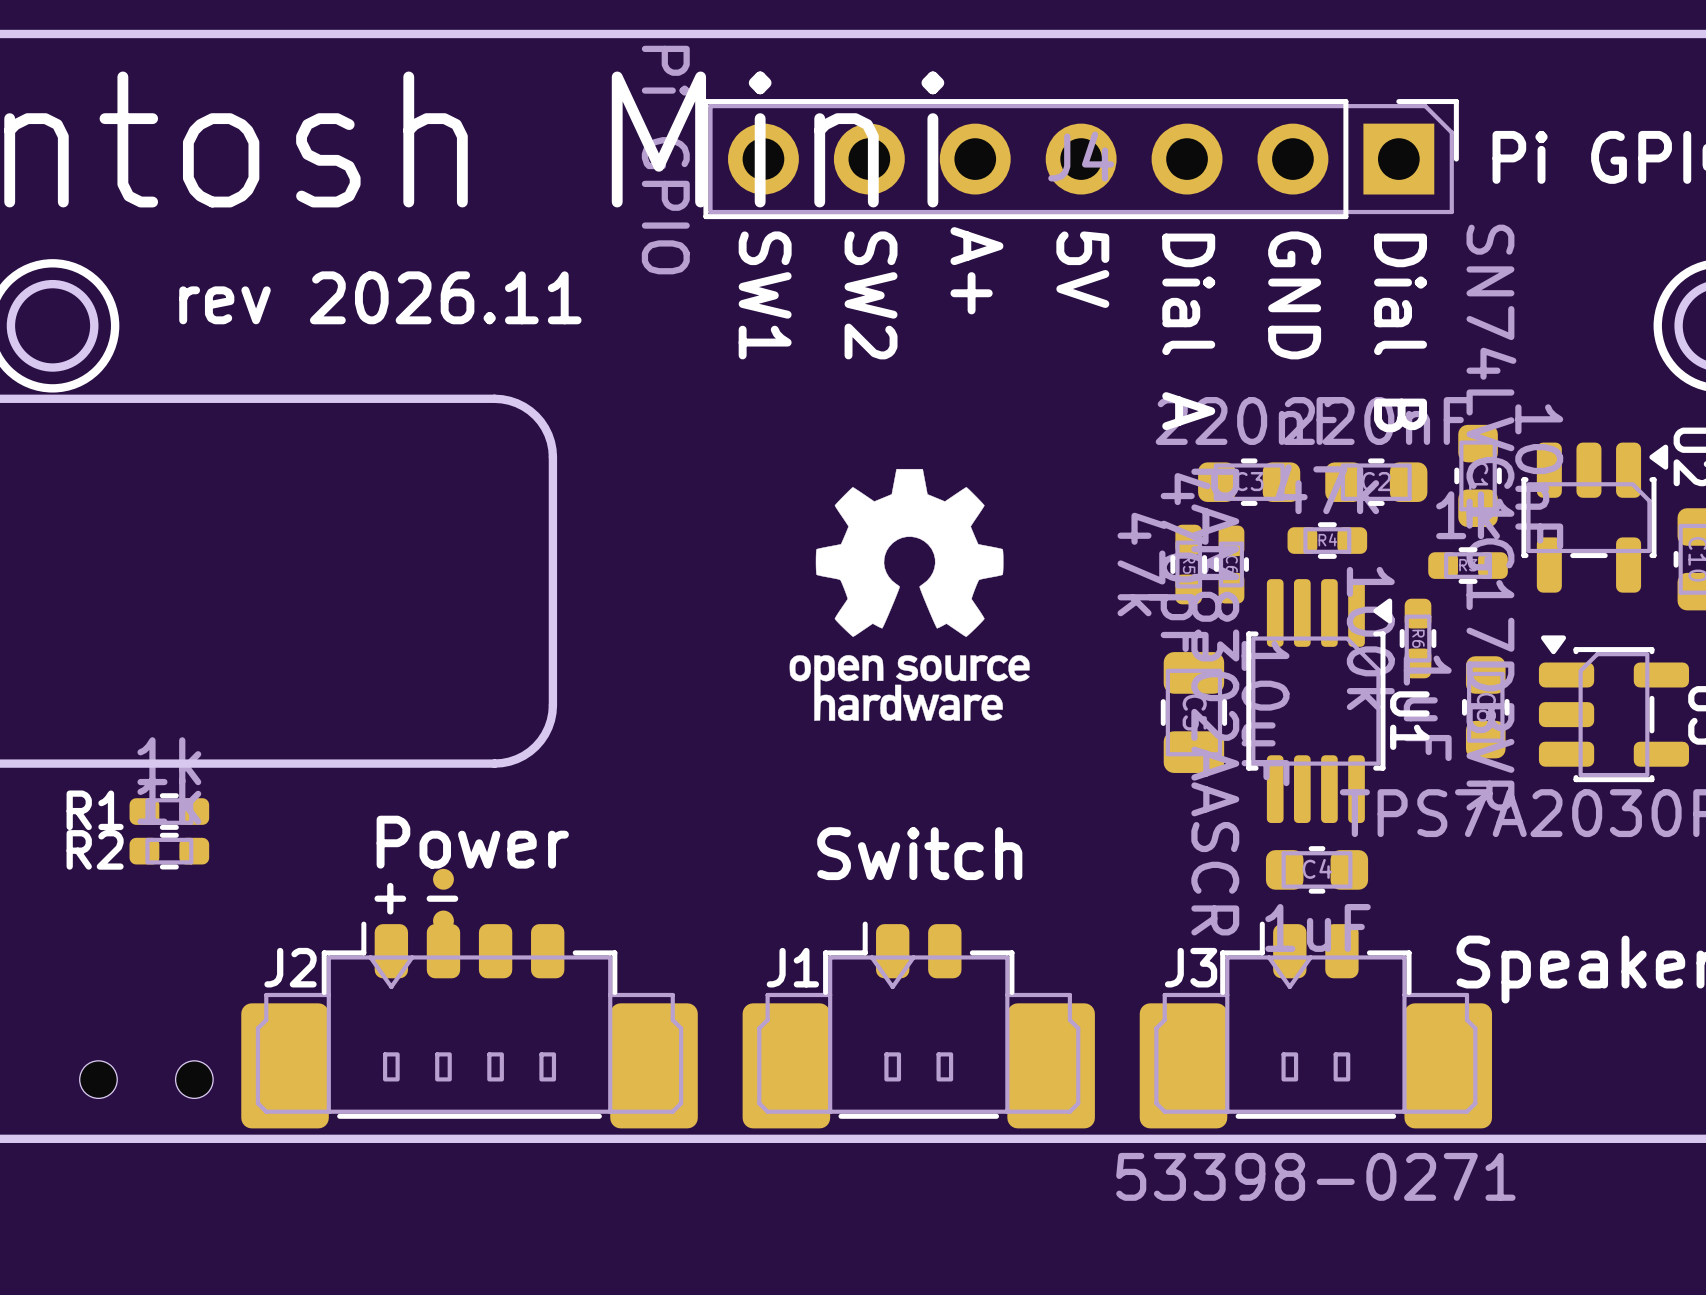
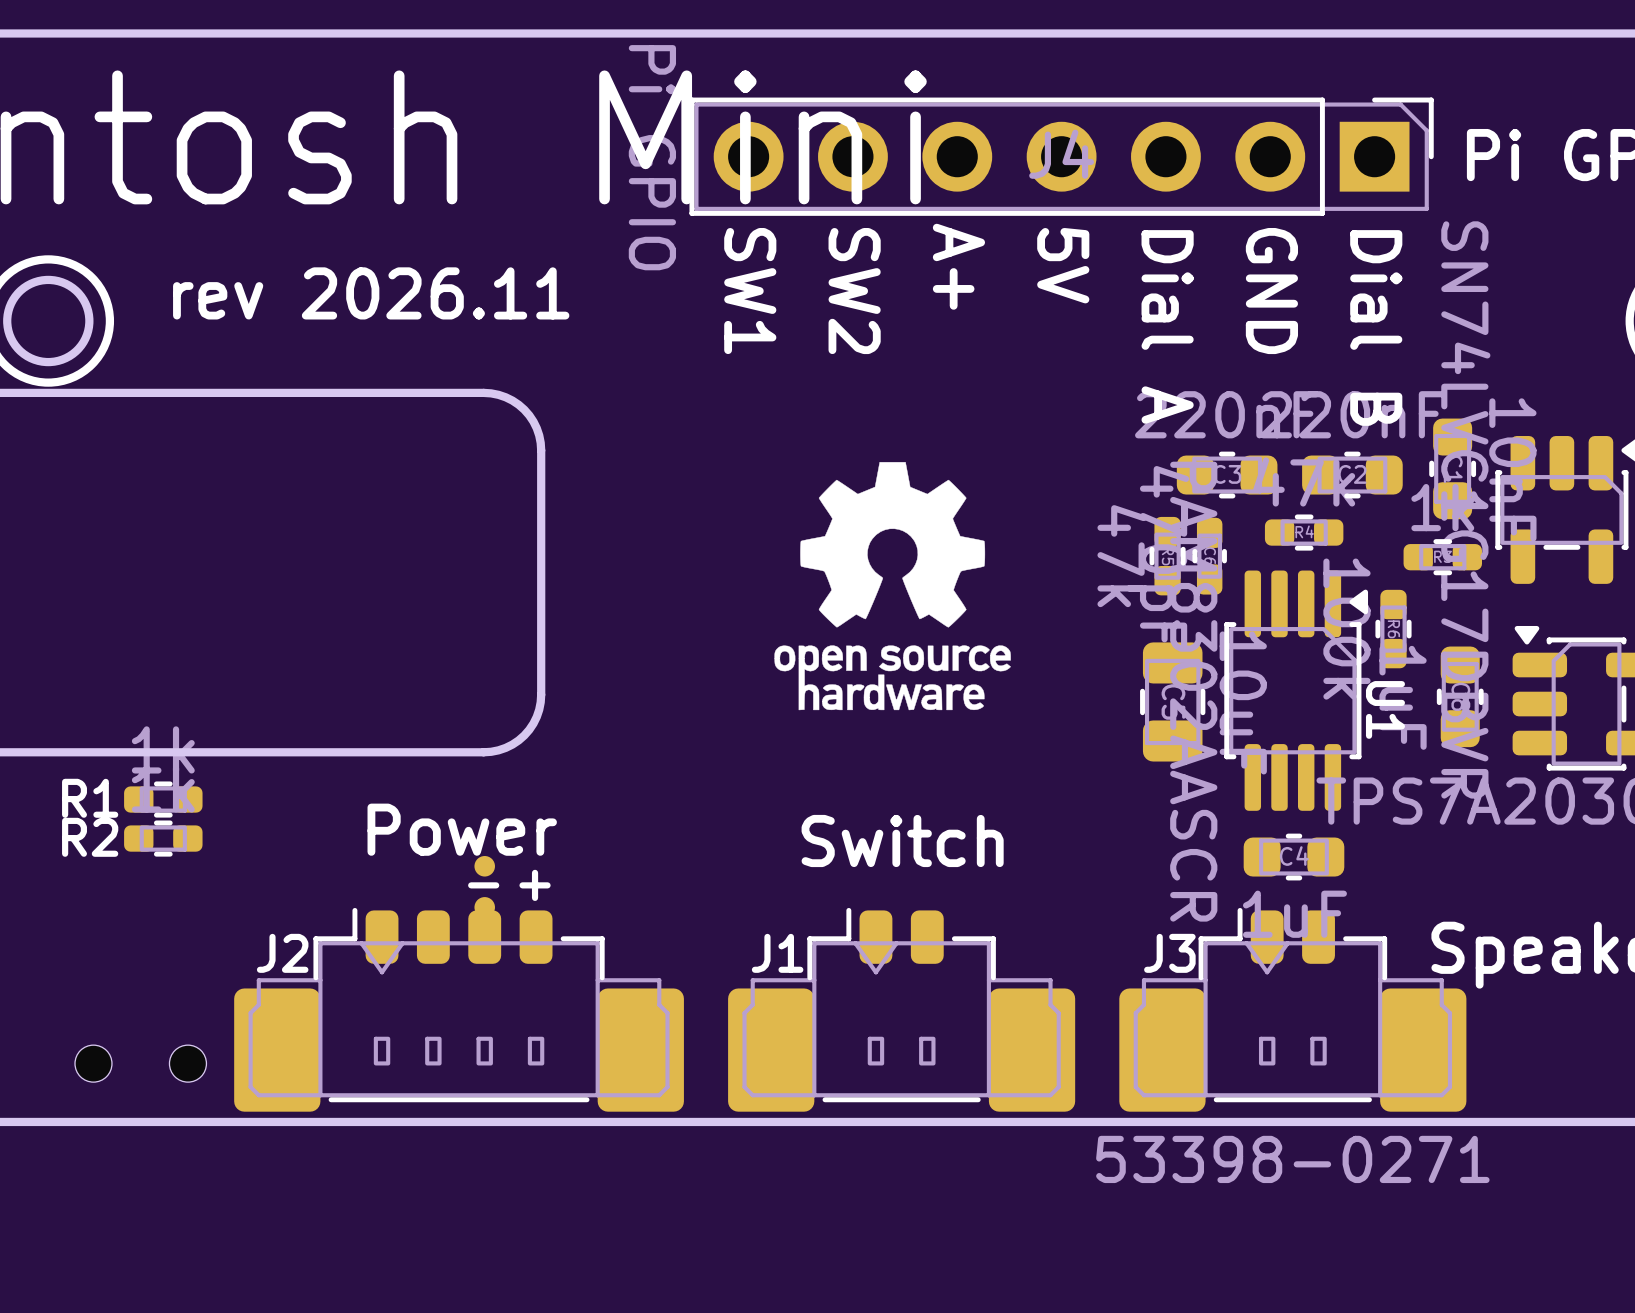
text position: + (390, 898) -> + (535, 885)
text position: - (442, 898) -> - (483, 885)
part position: (443, 900) -> (484, 886)

